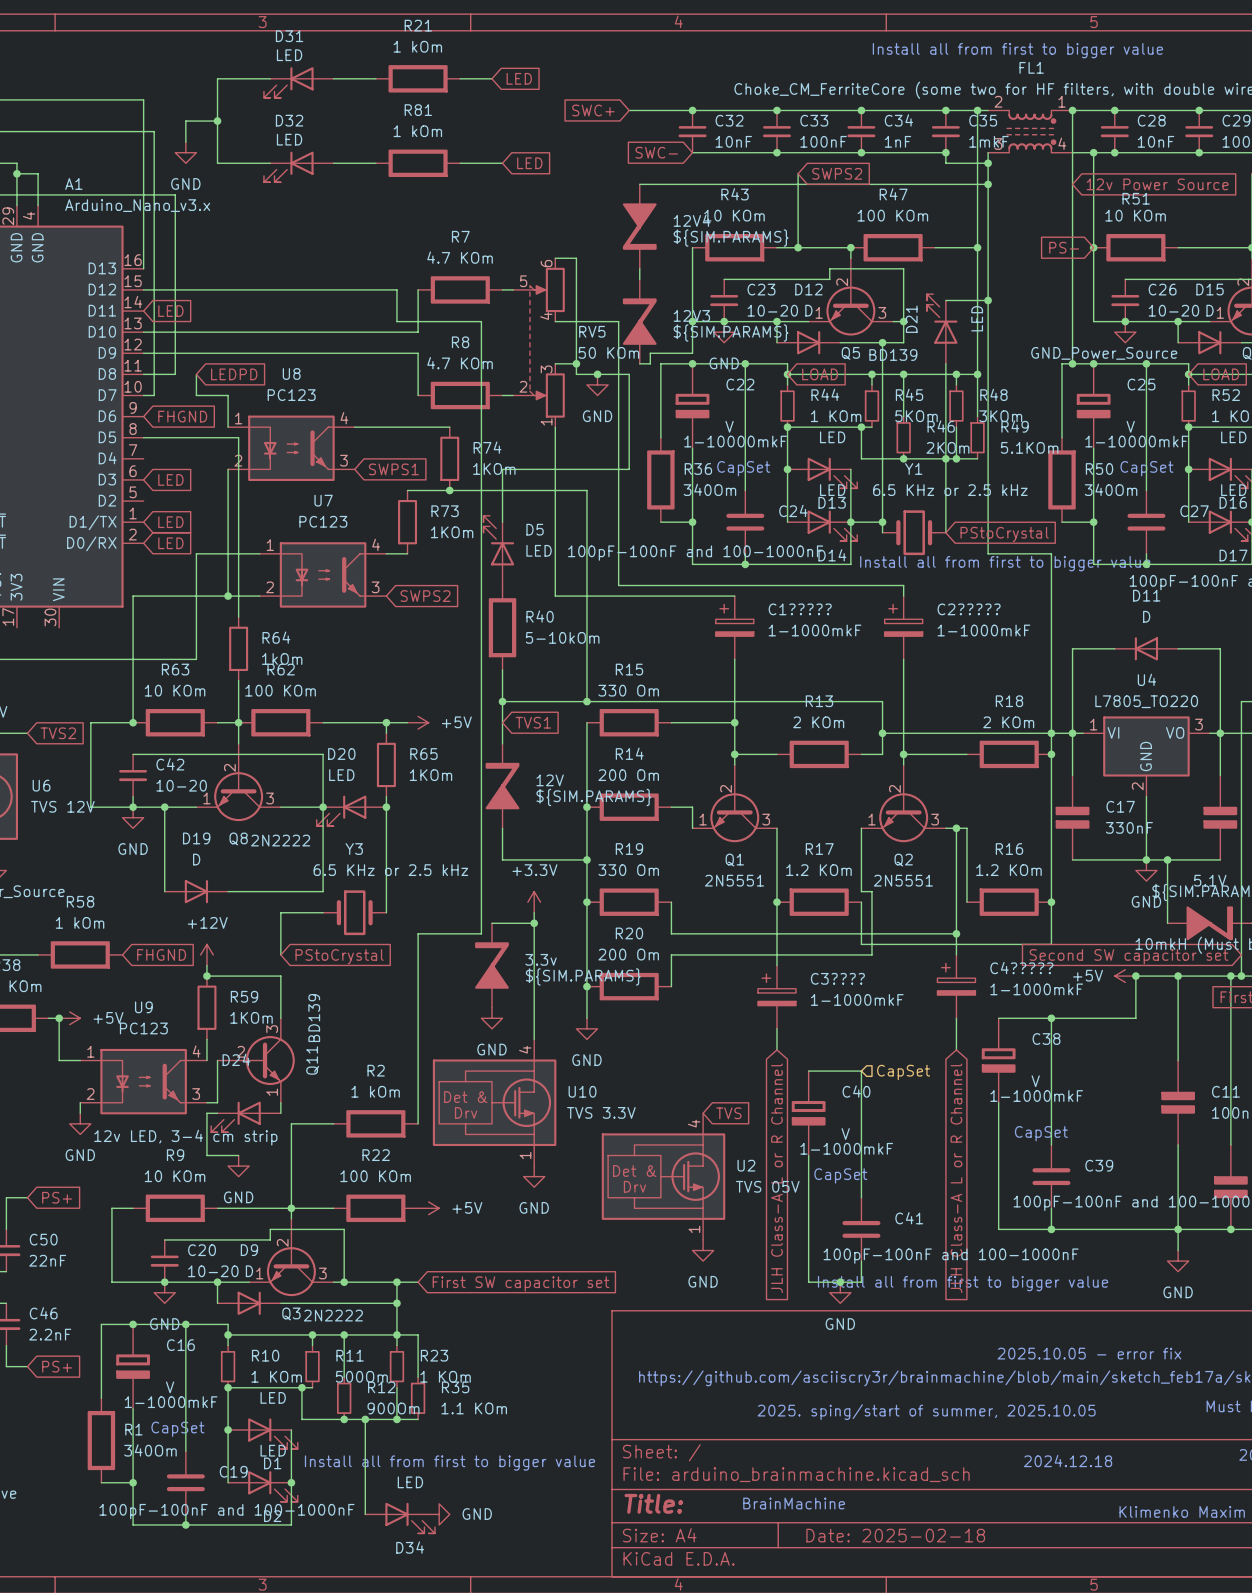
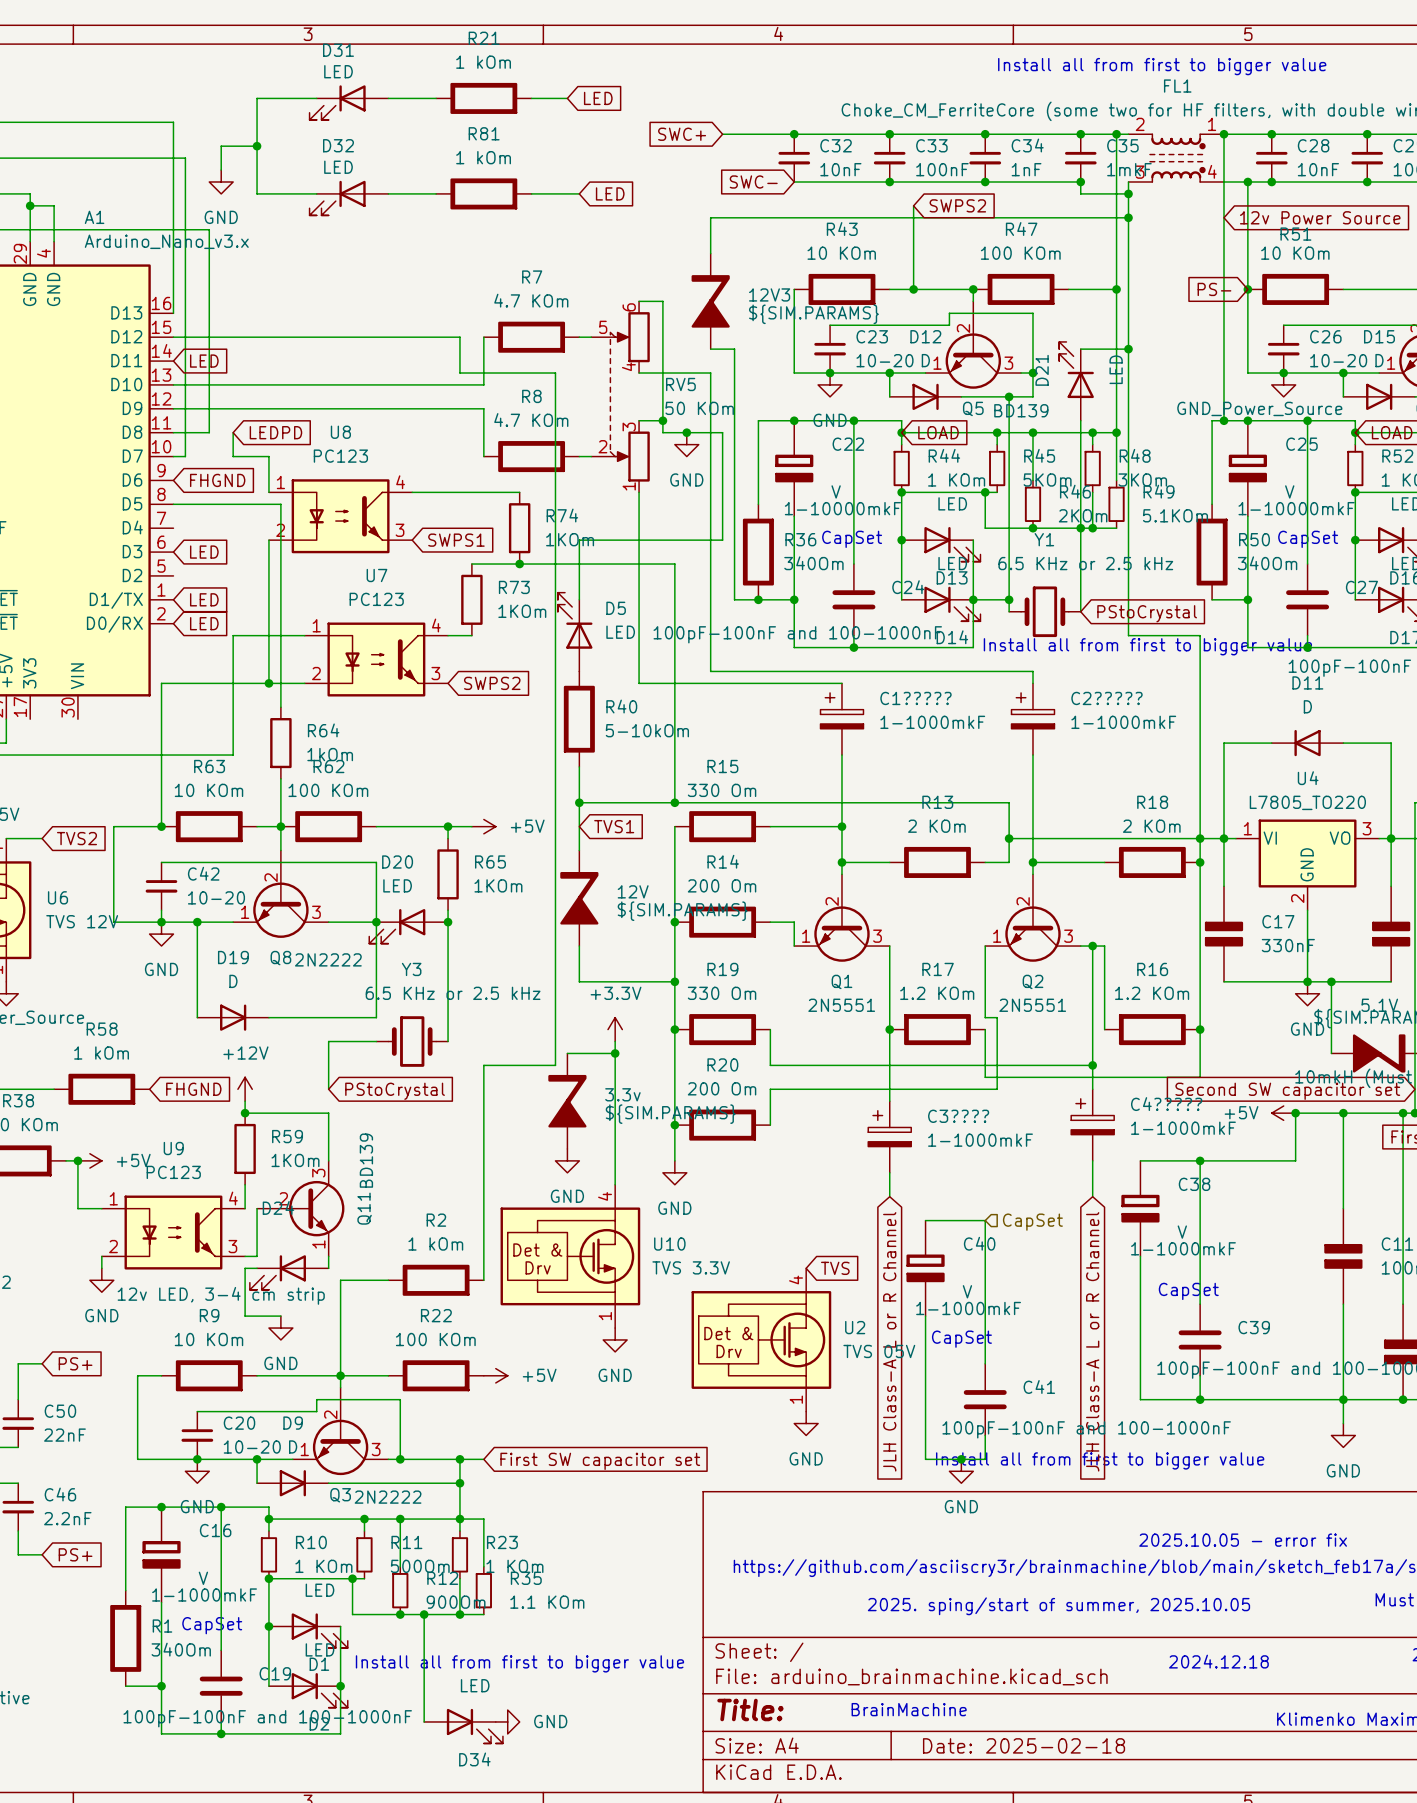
wire: none -> (734, 217) (710, 217) (710, 253)
12V4: ${SIM.PARAMS} (639, 226) -> none
wire: (639, 268) (639, 279) -> none
wire: none -> (710, 349) (734, 349) (734, 599) (758, 599)
12V3 position: (639, 321) -> (710, 301)
wire: (692, 321) (692, 353) (650, 353) (650, 363) (639, 363) -> none
junction: (692, 321) -> none
junction: none -> (758, 599)

